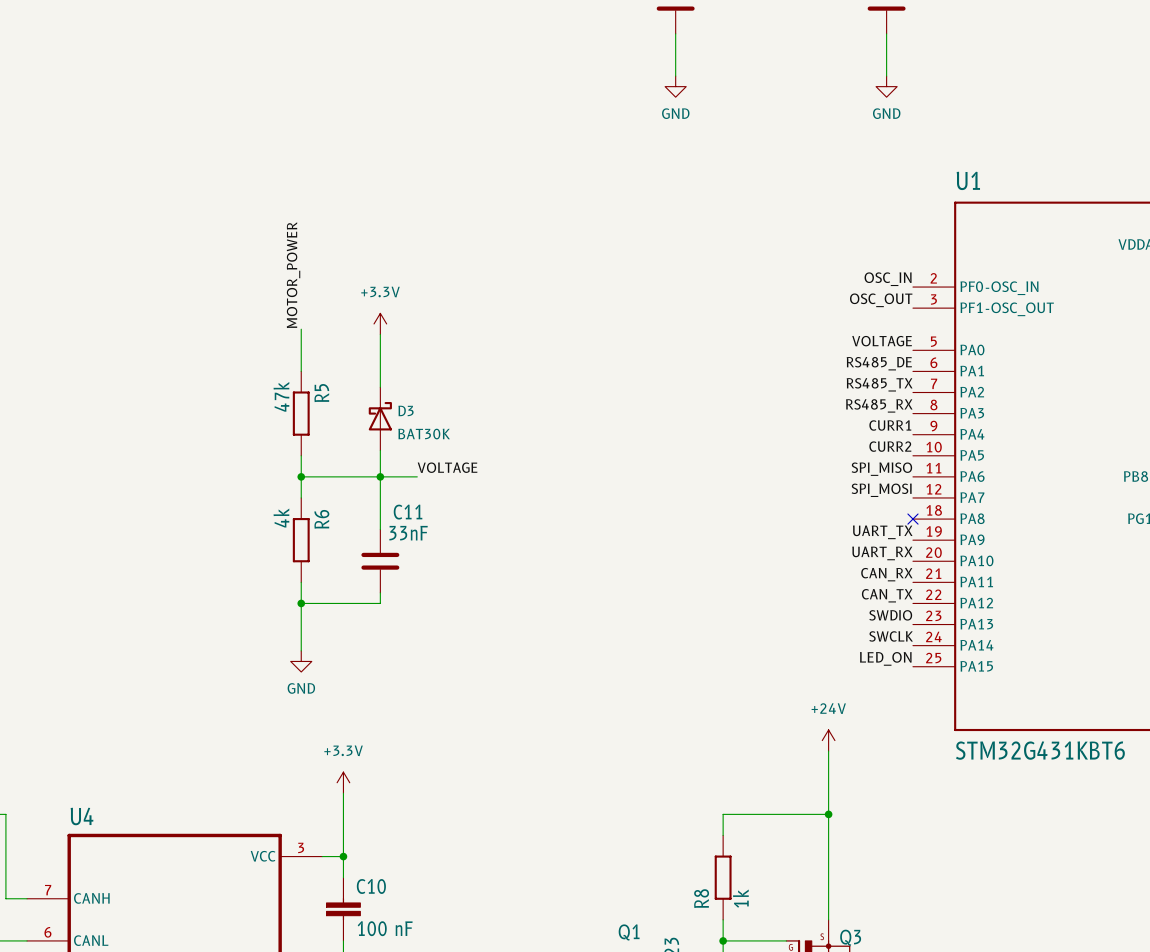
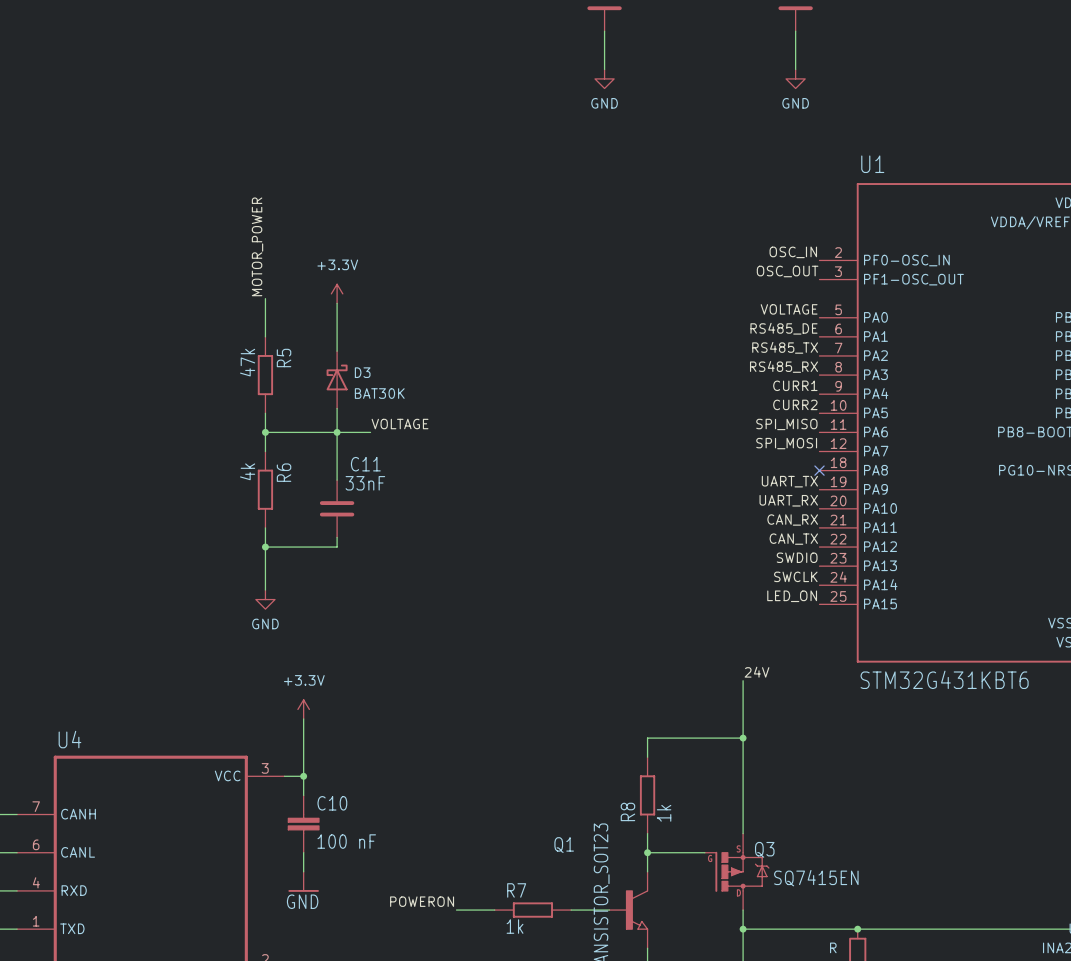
power symbol: +24V (828, 740) -> none
label: none -> 24V (756, 672)

